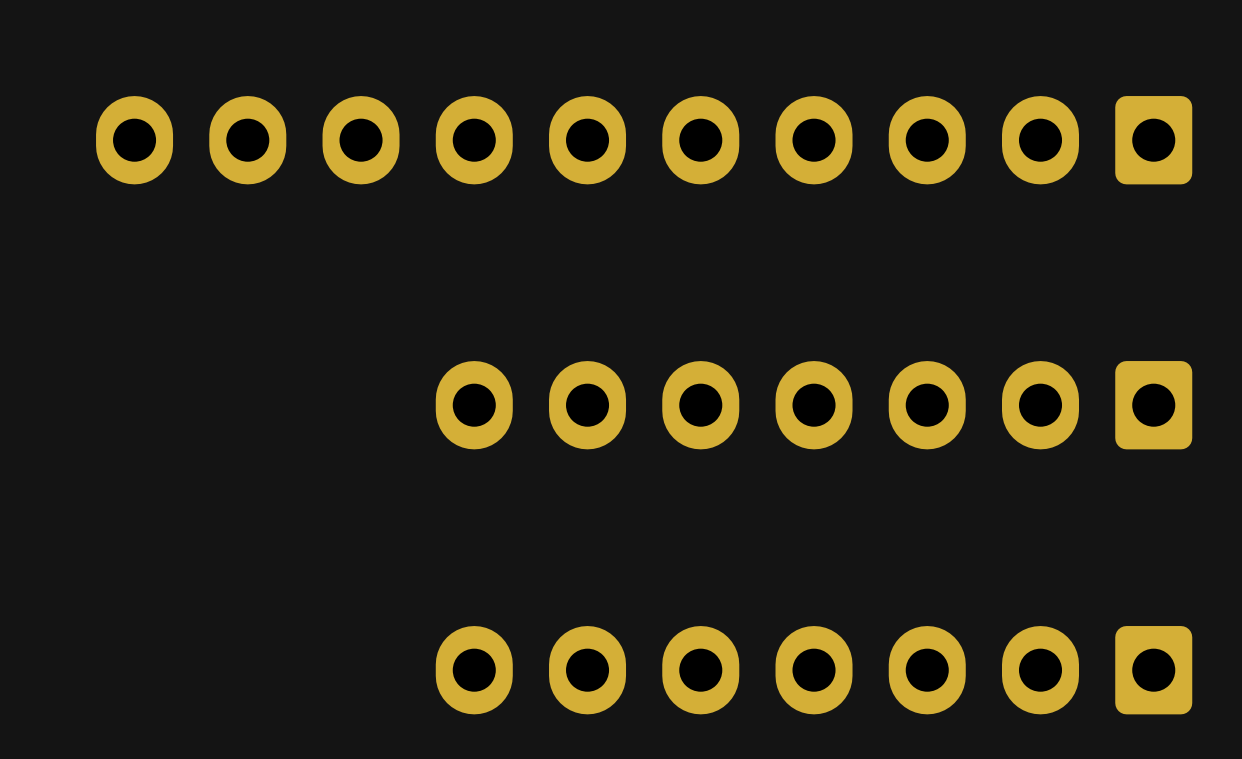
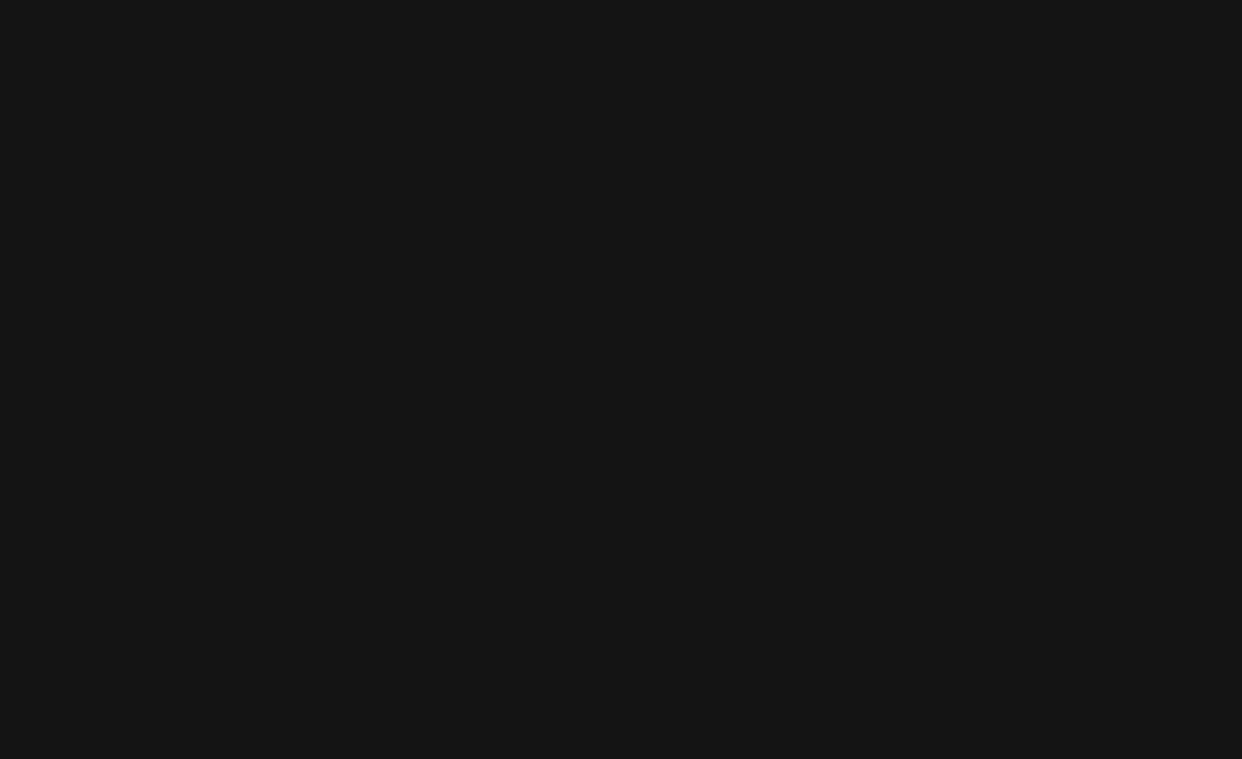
part: (644, 140) -> none
part: (814, 405) -> none
part: (814, 670) -> none

